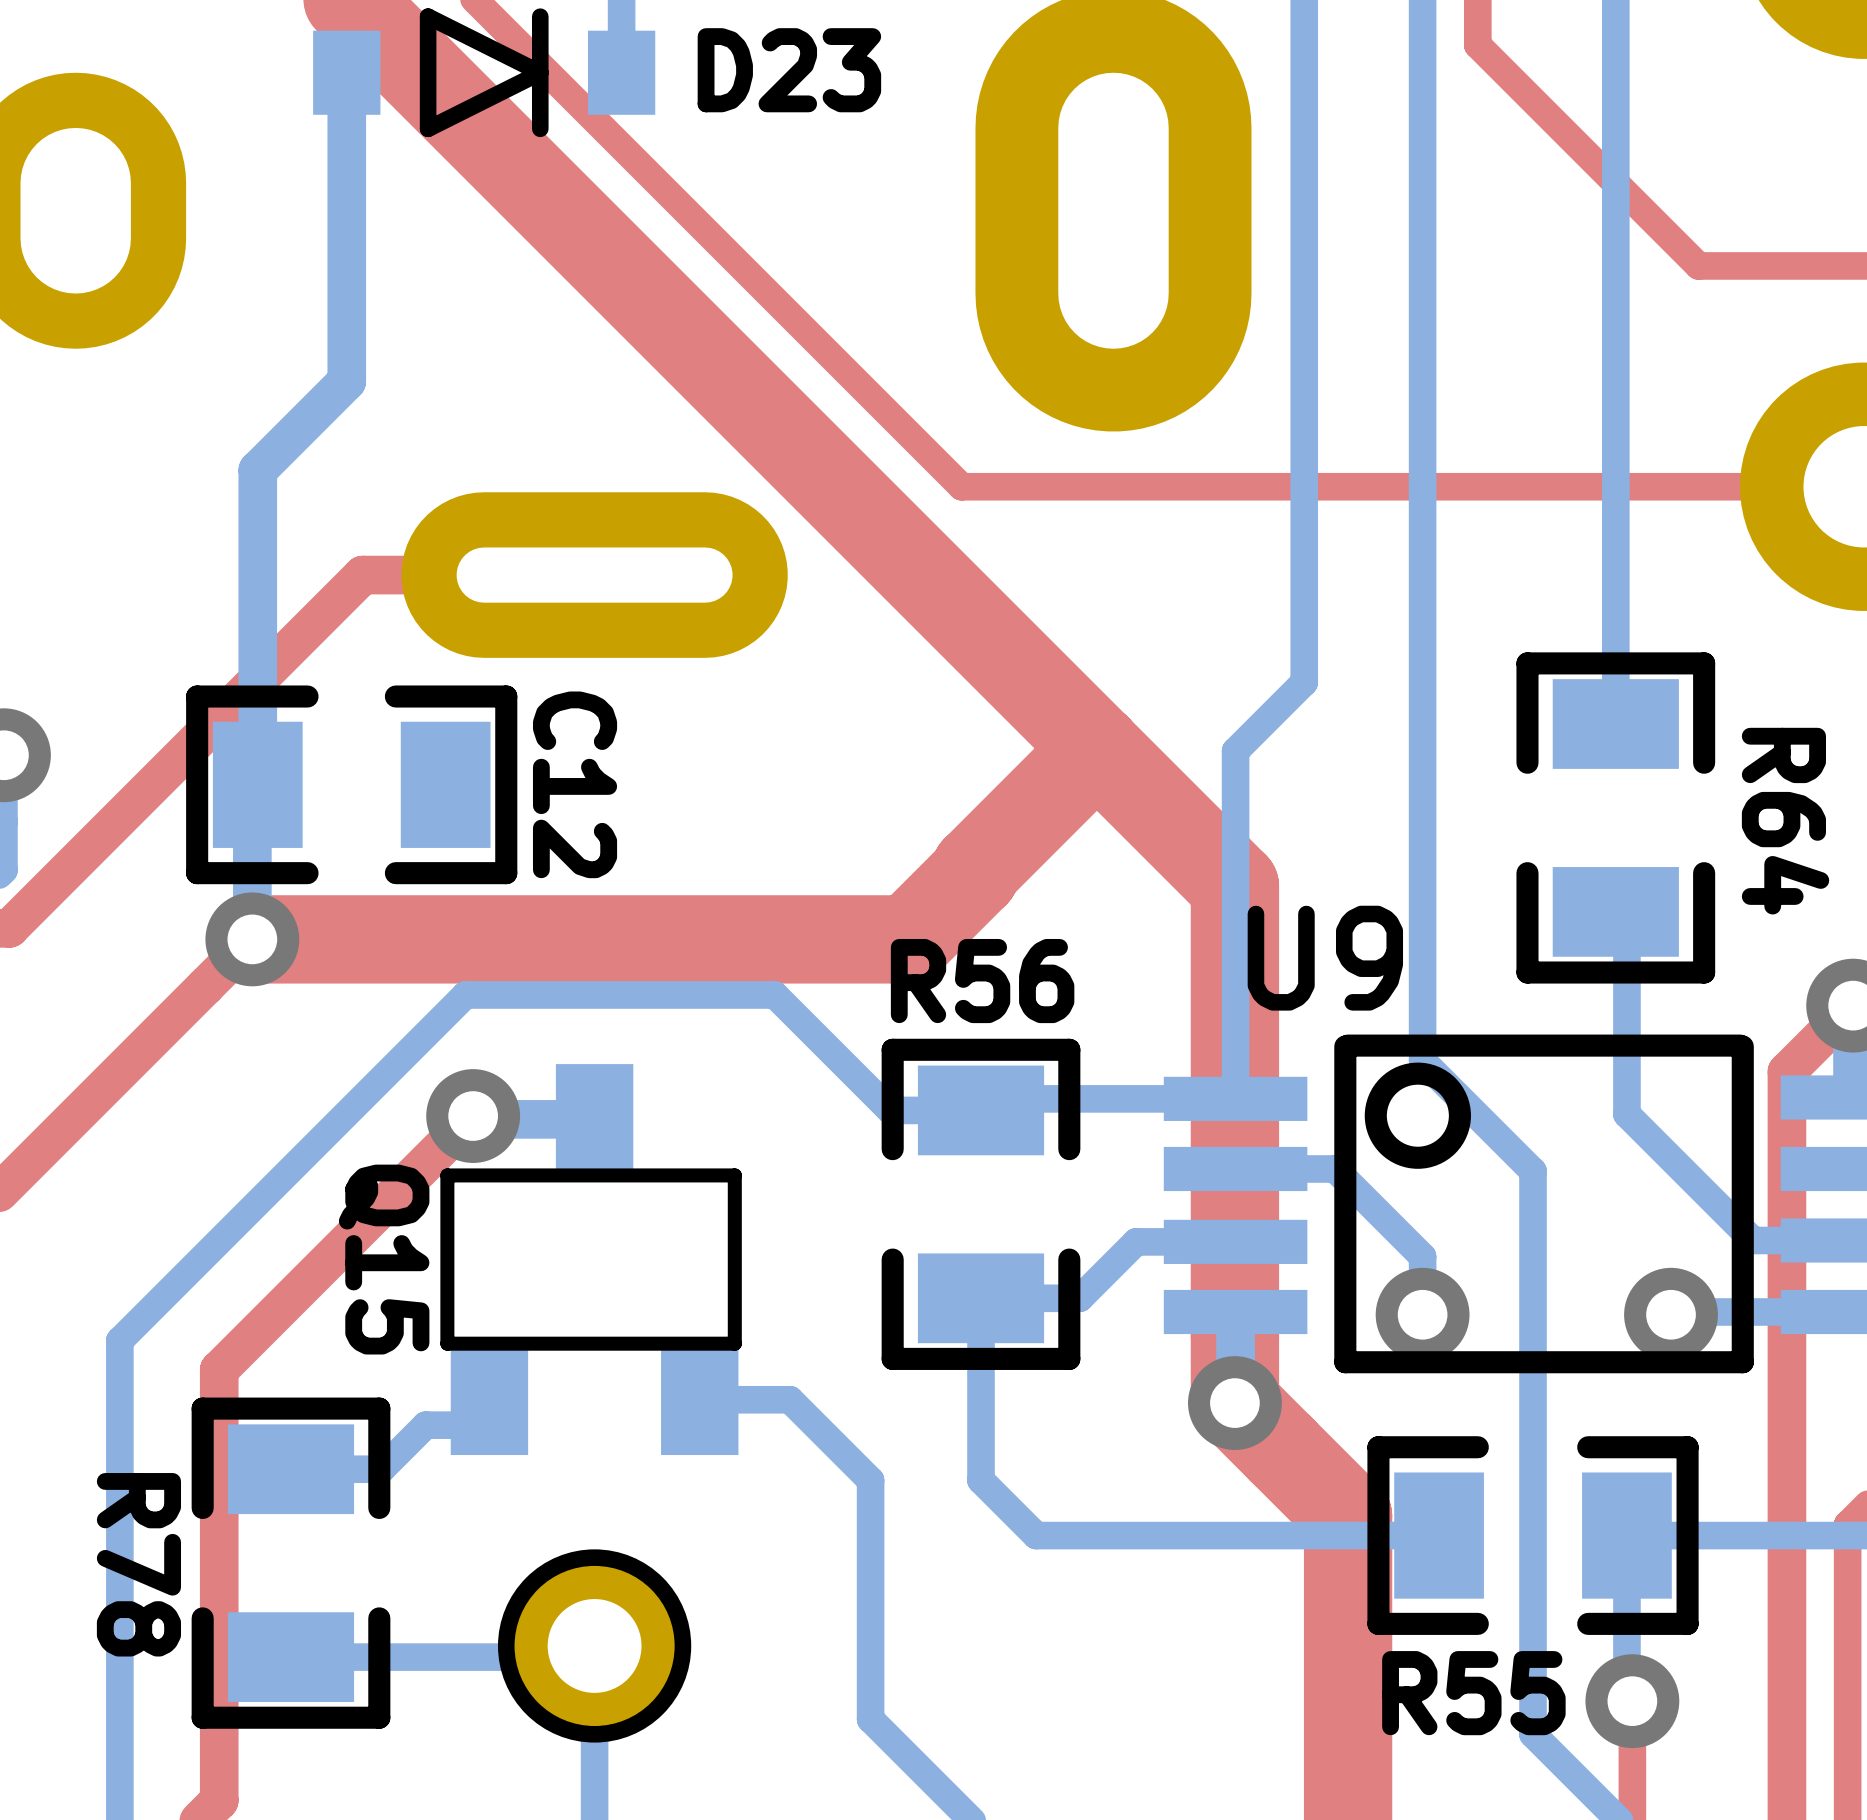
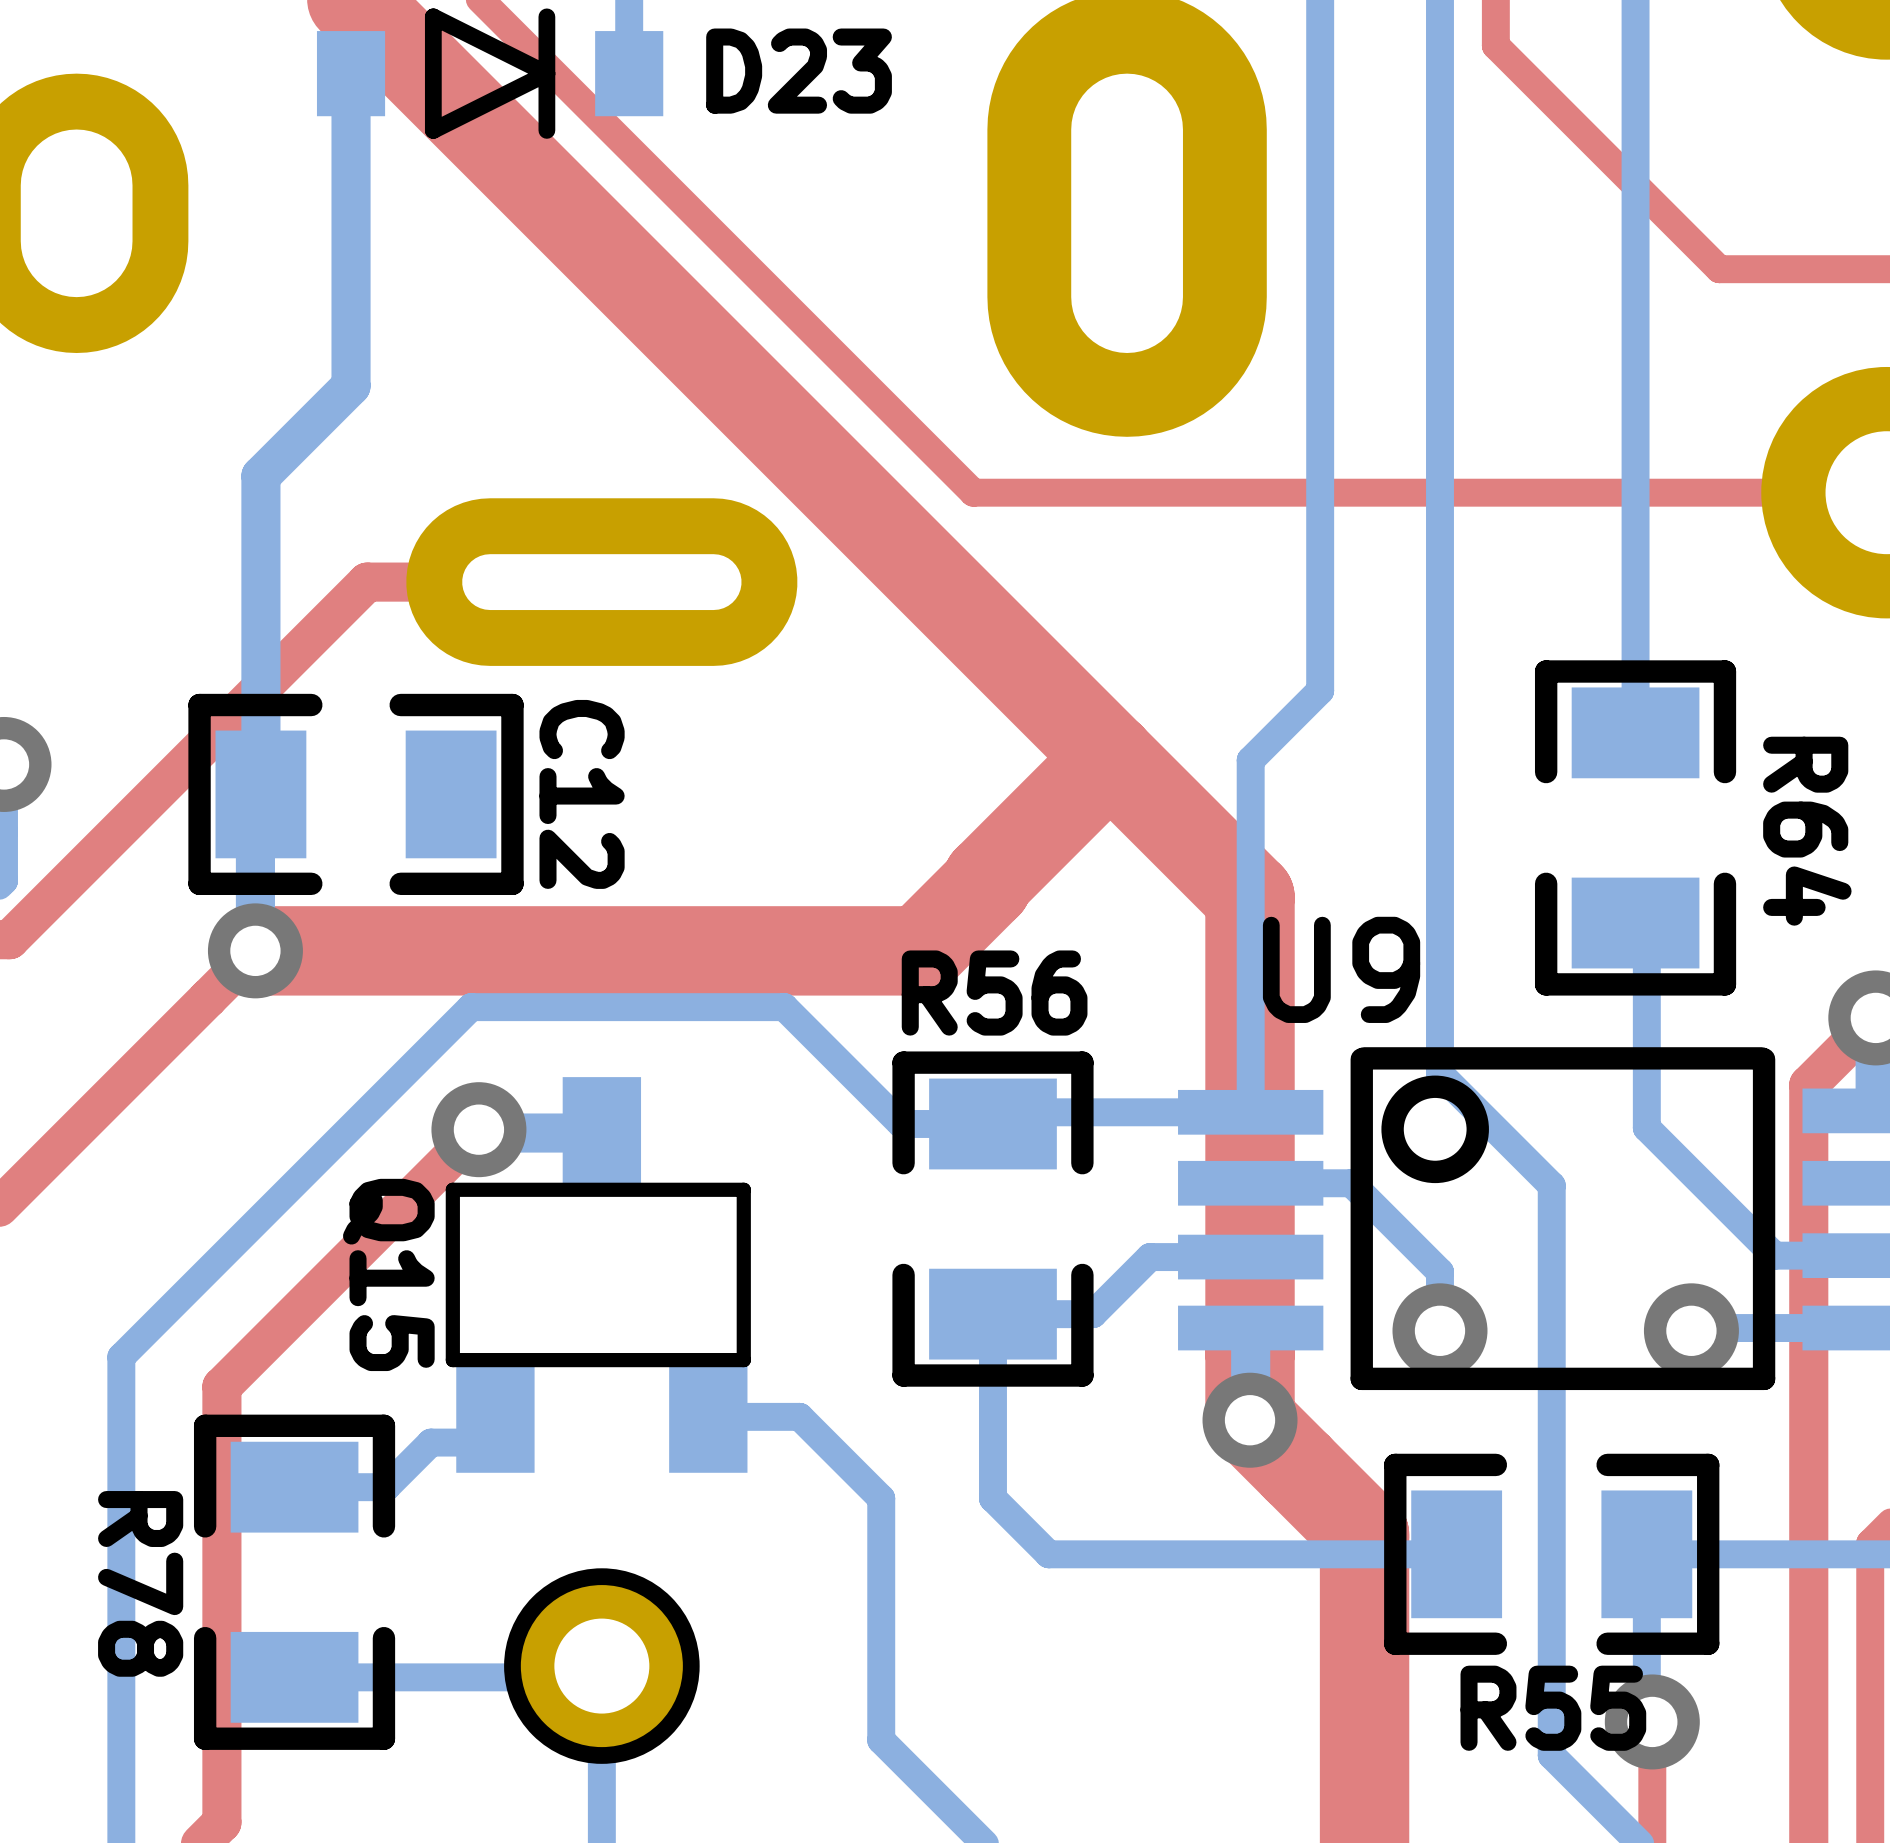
R55 name position: R55 (1473, 1693) -> R55 (1553, 1708)

